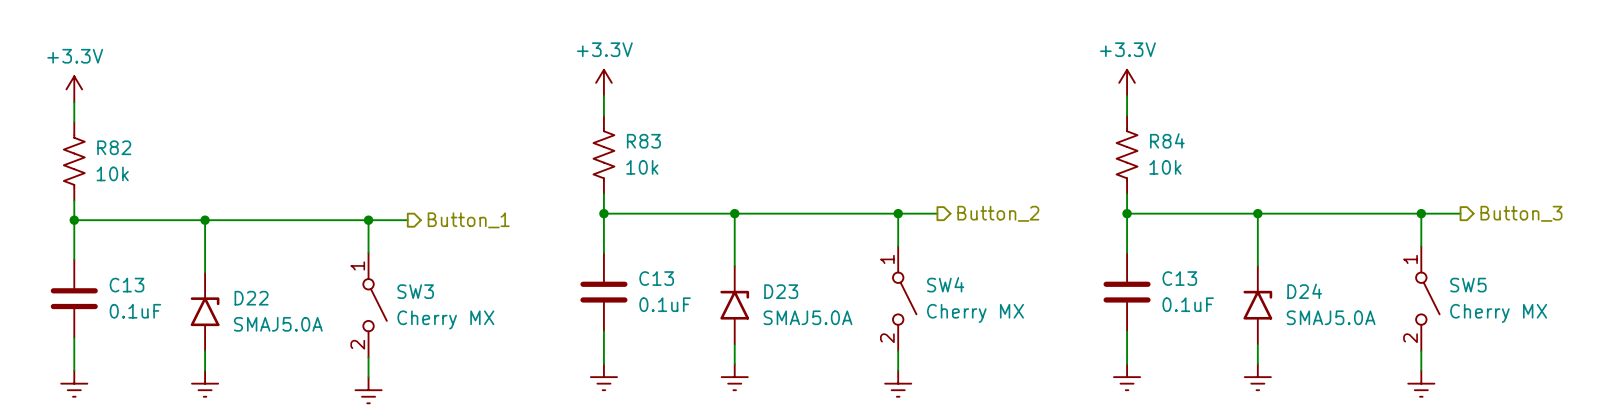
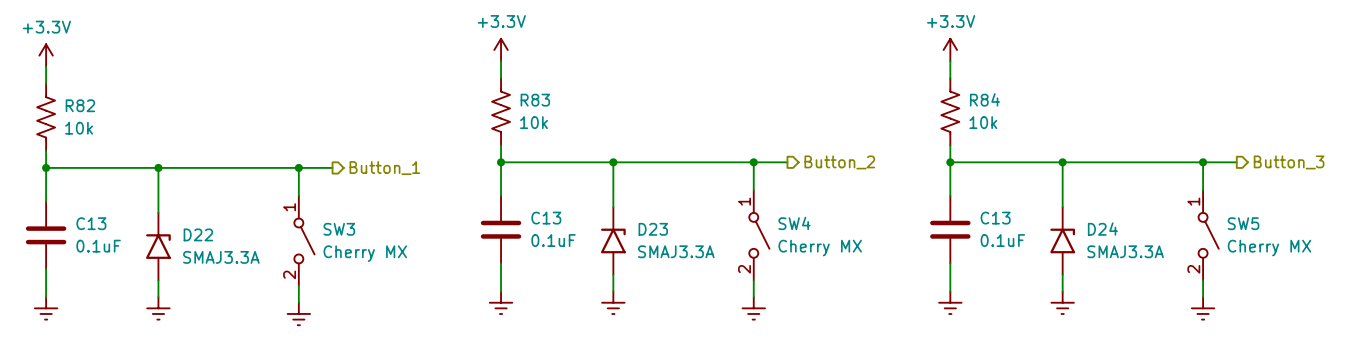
D23 value: SMAJ5.0A (807, 317) -> SMAJ3.3A (676, 251)
D24 value: SMAJ5.0A (1331, 317) -> SMAJ3.3A (1125, 251)
D22 value: SMAJ5.0A (278, 324) -> SMAJ3.3A (221, 257)

